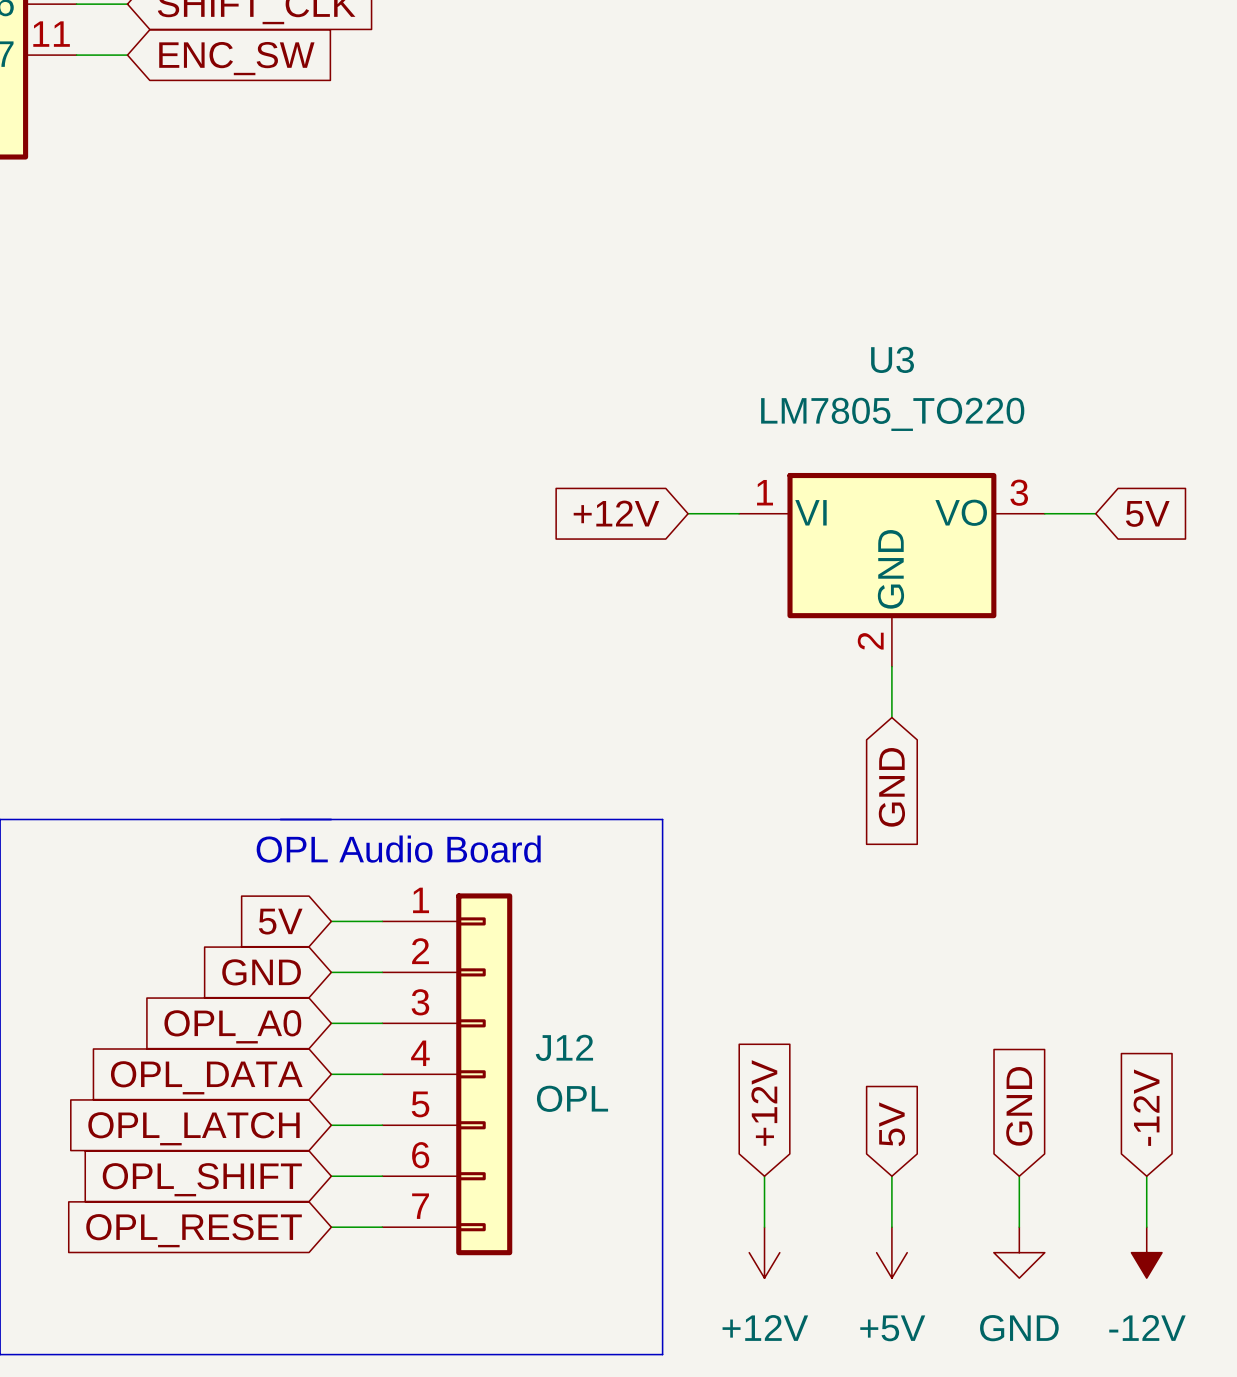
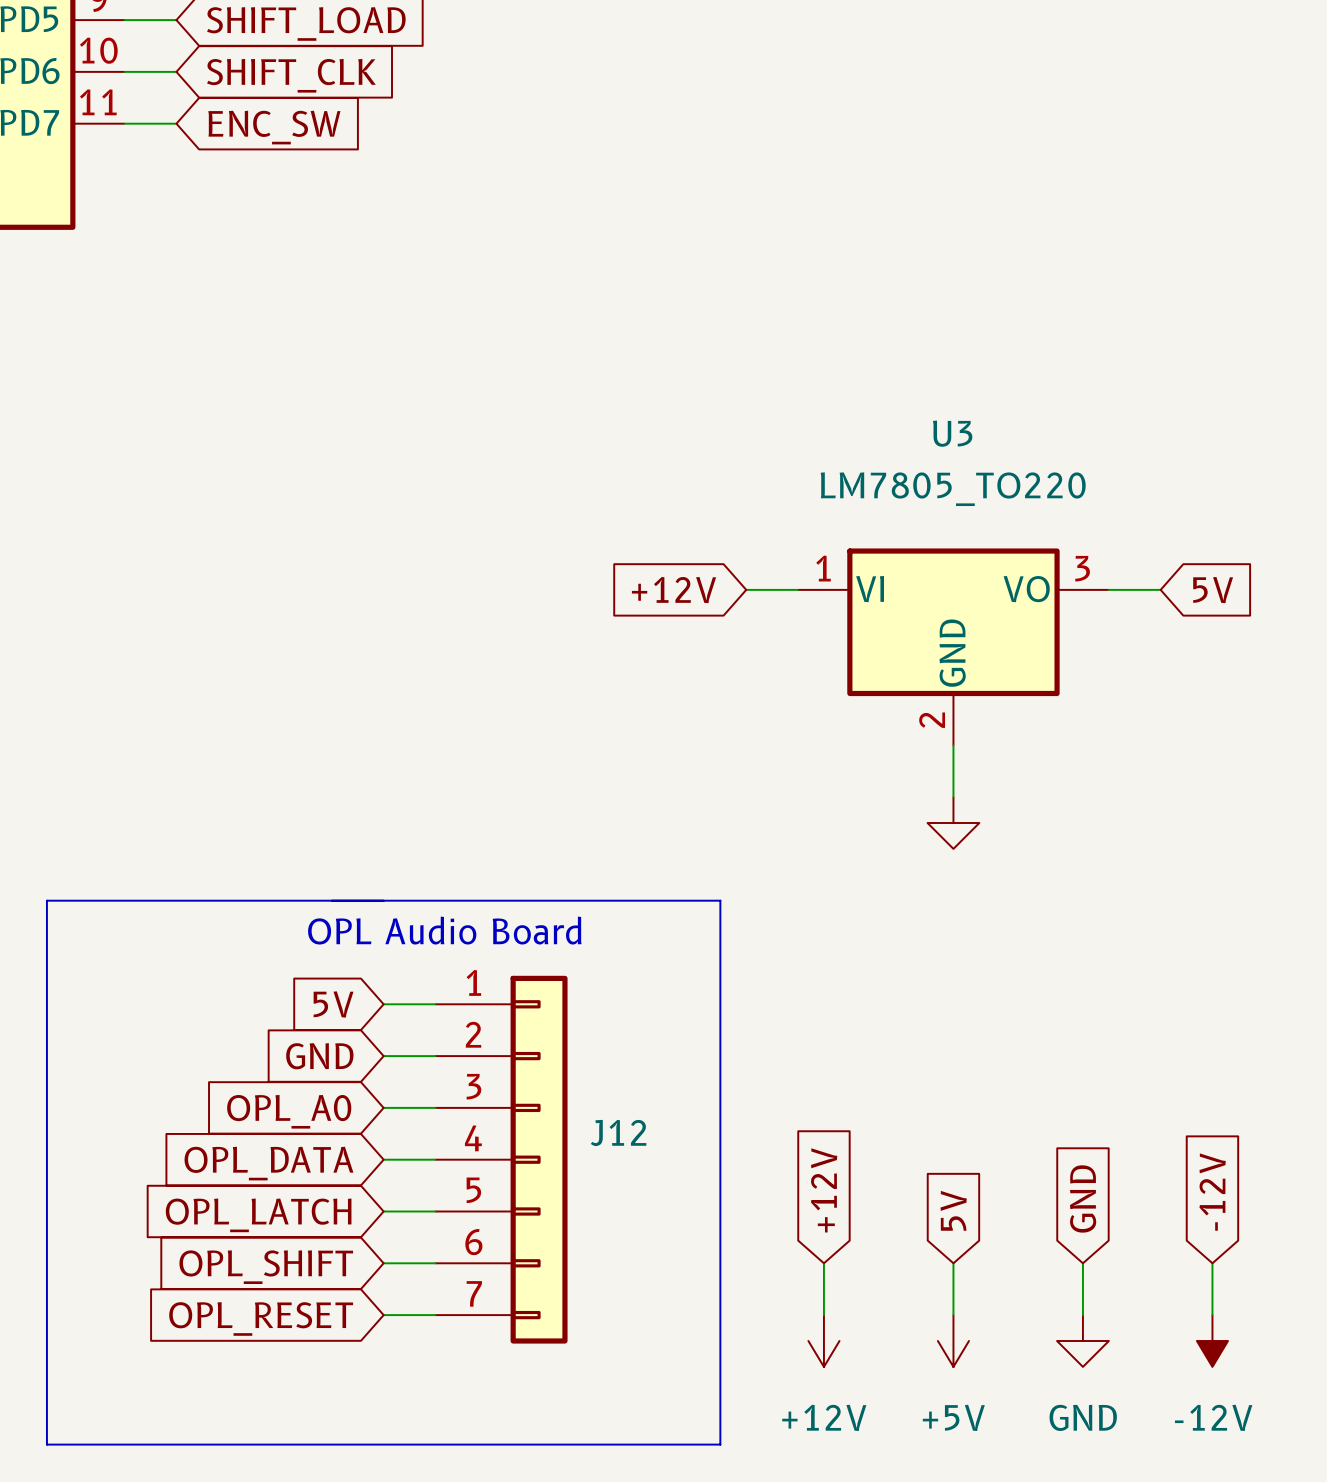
power symbol: none -> (953, 822)
global label: GND (891, 787) -> none
J12 value: OPL (572, 1098) -> none

